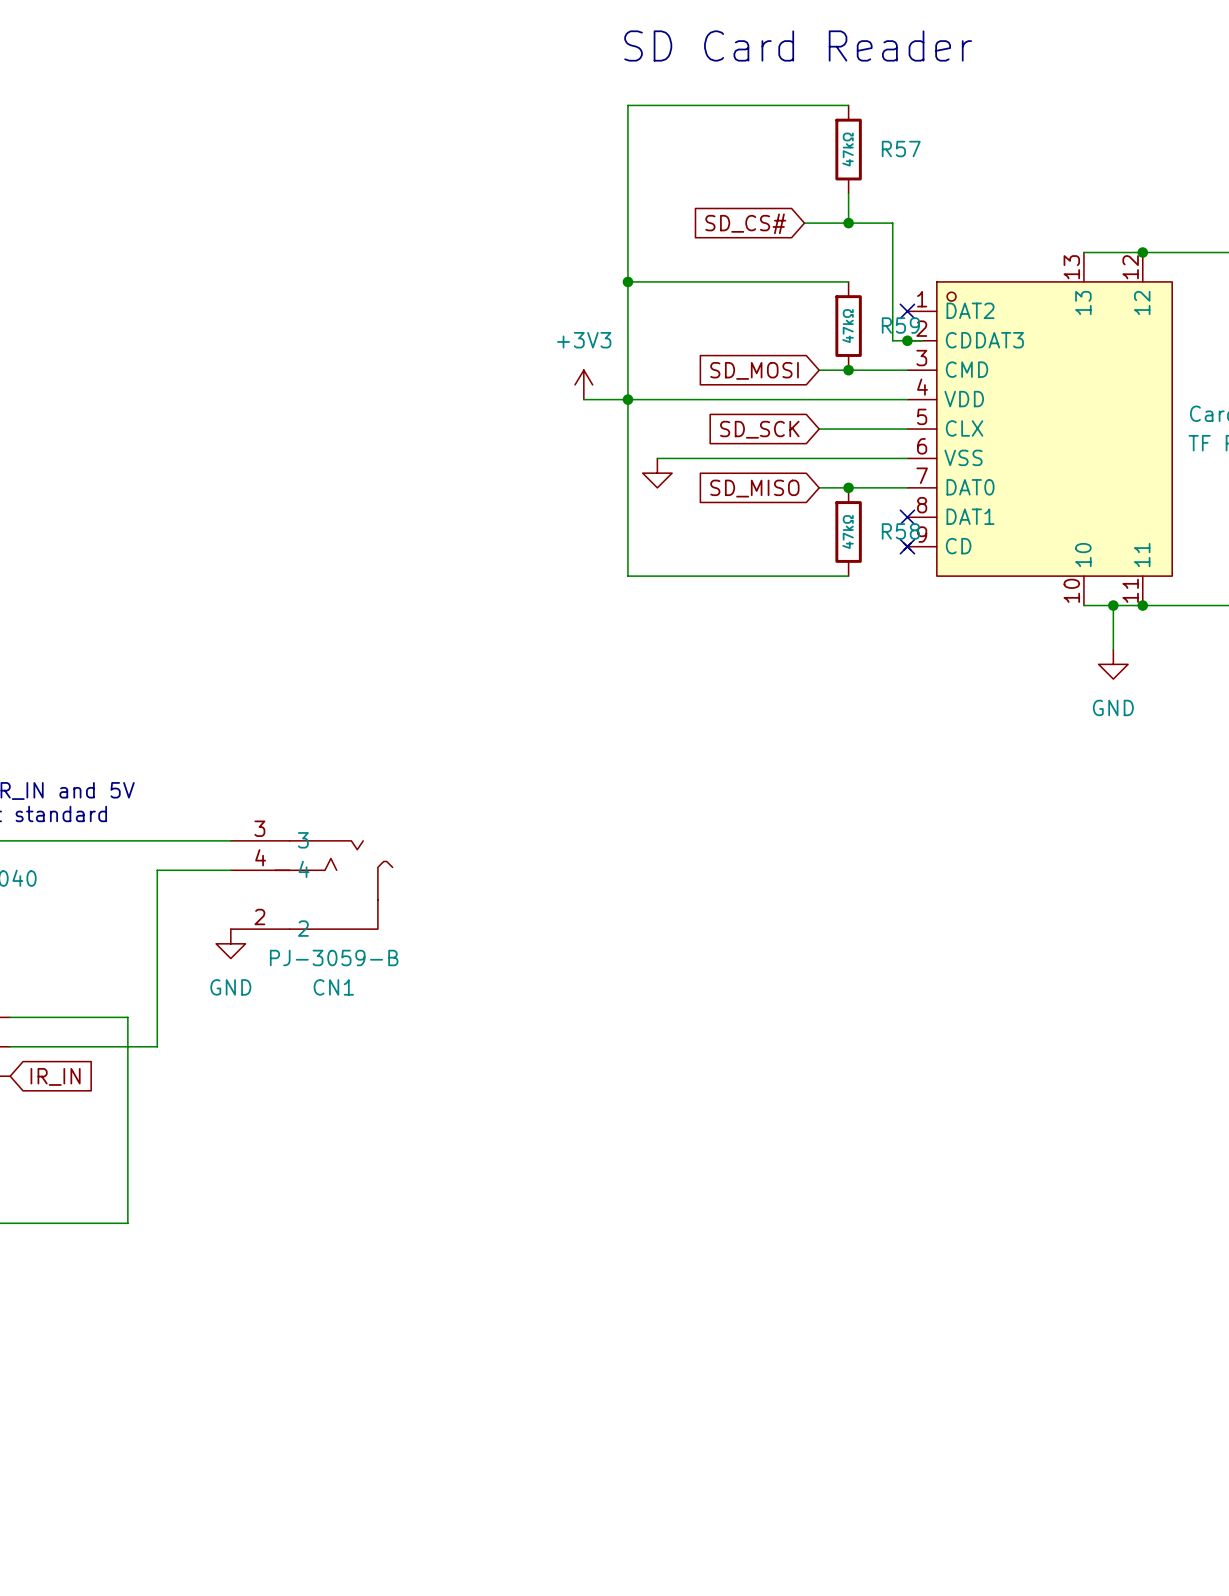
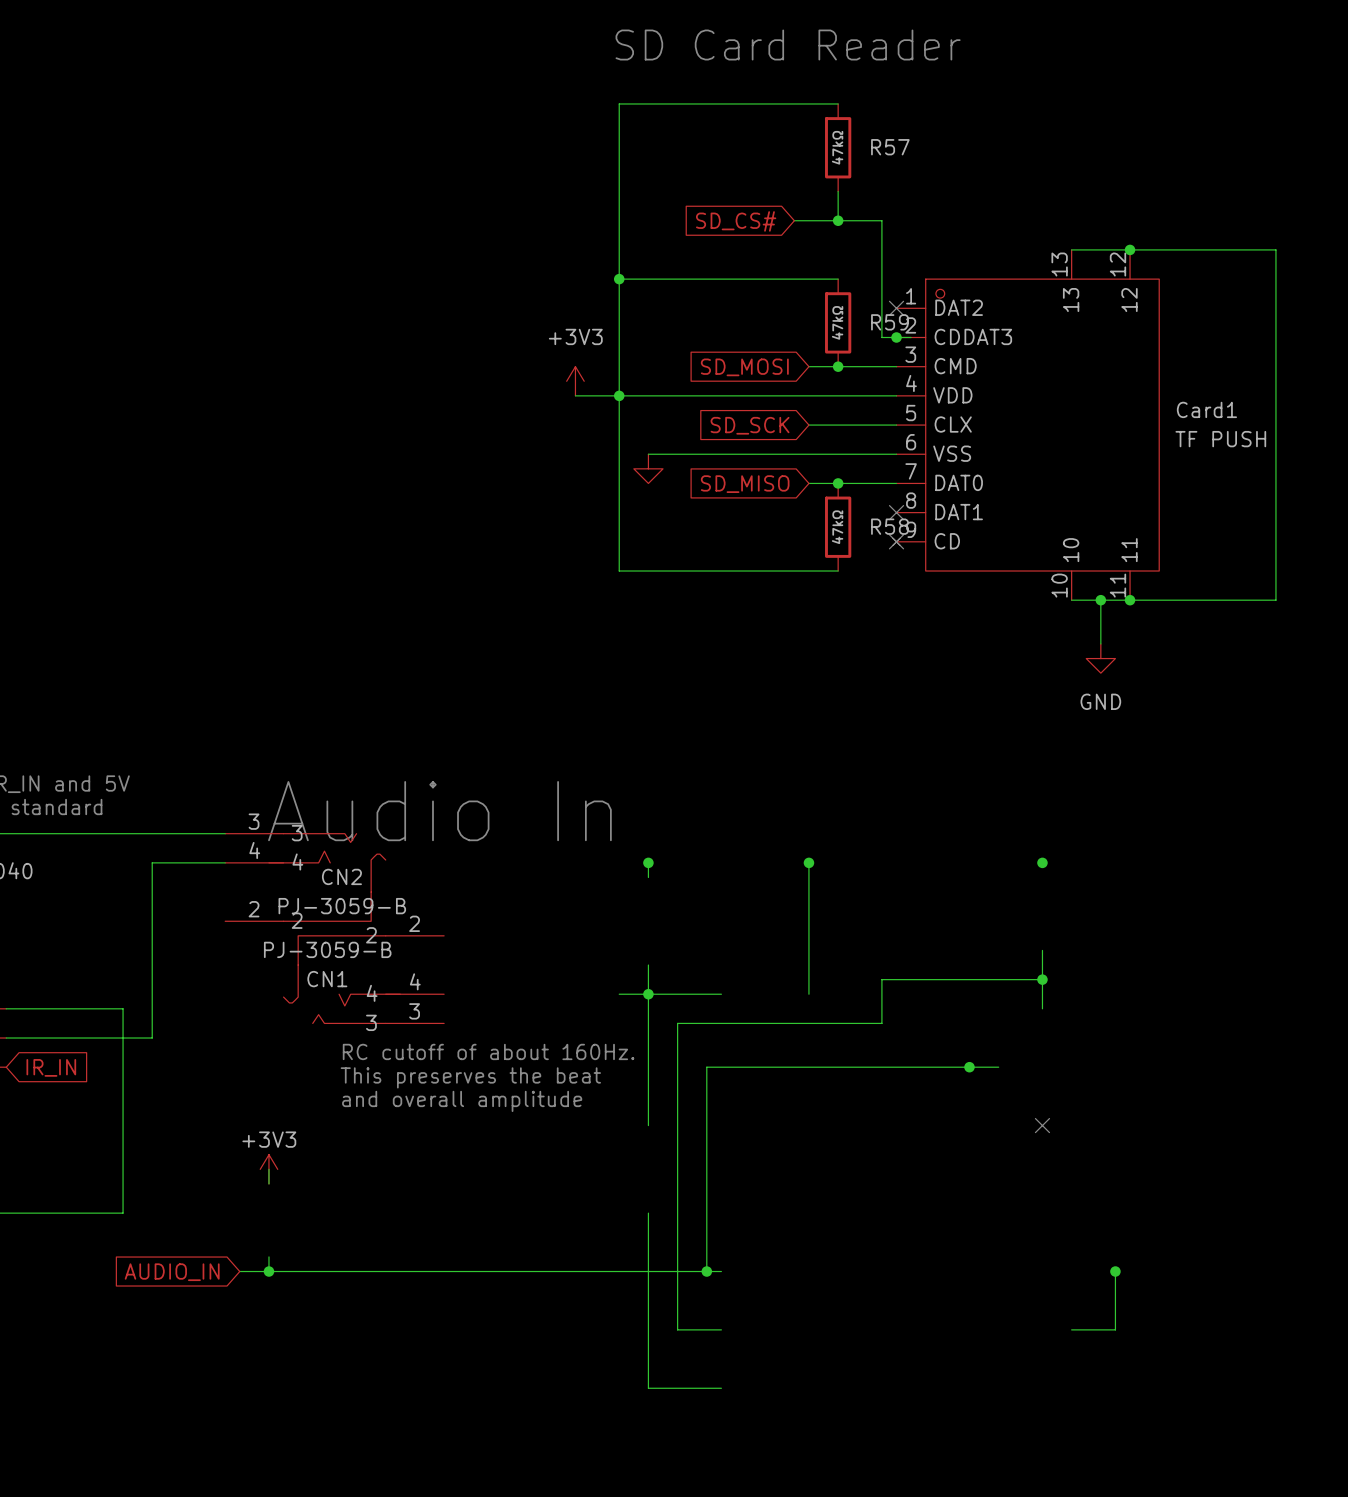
text: none -> Audio In (439, 811)
wire: none -> (648, 862) (648, 877)
junction: none -> (648, 862)
wire: none -> (808, 862) (808, 994)
junction: none -> (808, 862)
junction: none -> (1042, 862)
power symbol: GND (230, 943) -> none
wire: none -> (1042, 950) (1042, 1008)
wire: none -> (648, 965) (648, 1125)
CN2: none -> PJ-3059-B (363, 979)
wire: none -> (1042, 979) (881, 979) (881, 1023) (677, 1023) (677, 1329) (721, 1329)
junction: none -> (1042, 979)
wire: none -> (619, 994) (721, 994)
junction: none -> (648, 994)
text: none -> RC cutoff of about 160Hz. (488, 1051)
junction: none -> (969, 1067)
wire: none -> (998, 1067) (706, 1067) (706, 1271)
text: none -> This preserves the beat (470, 1077)
text: none -> and overall amplitude (462, 1101)
no-connect mark: none -> (1042, 1125)
wire: none -> (268, 1169) (268, 1183)
power symbol: none -> +3V3 (268, 1169)
wire: none -> (648, 1213) (648, 1388) (721, 1388)
wire: none -> (268, 1256) (268, 1271)
global label: none -> AUDIO_IN (172, 1272)
wire: none -> (239, 1271) (721, 1271)
junction: none -> (268, 1271)
junction: none -> (706, 1271)
wire: none -> (1115, 1271) (1115, 1329) (1071, 1329)
junction: none -> (1115, 1271)

